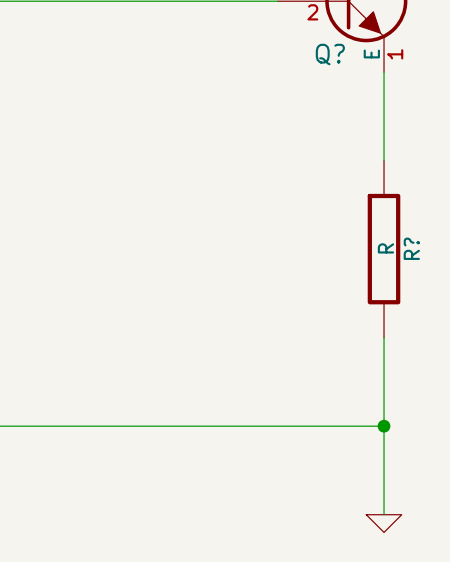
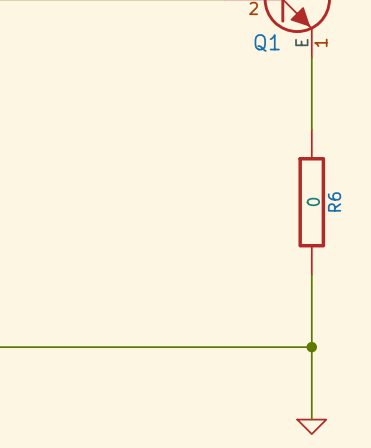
Q? name: Q? (330, 54) -> Q1 (267, 42)
R? value: R (385, 248) -> 0 (313, 201)
R? name: R? (411, 248) -> R6 (334, 201)

